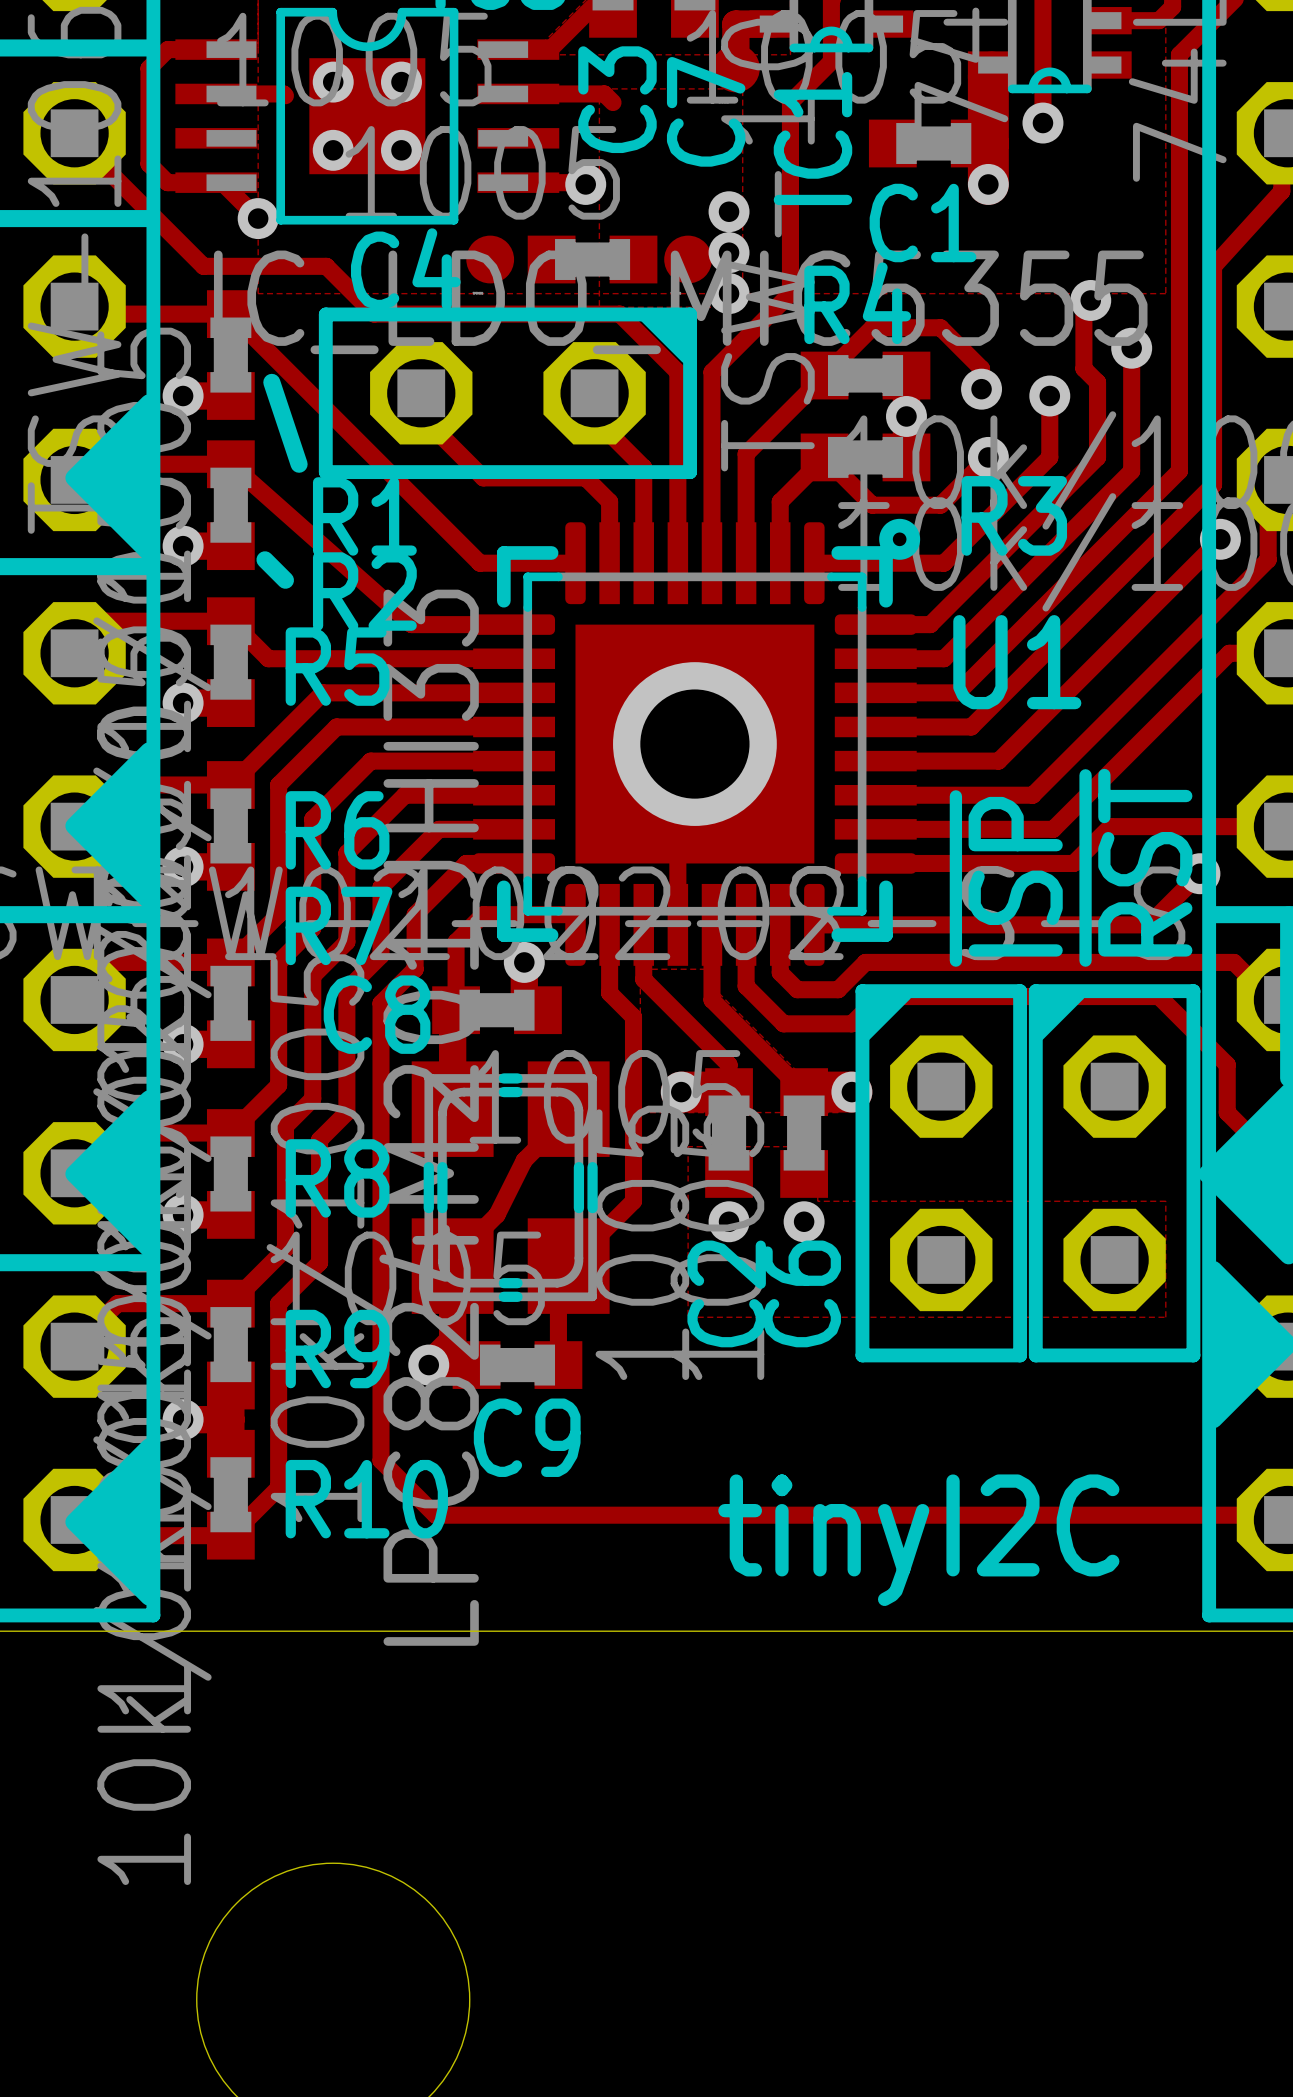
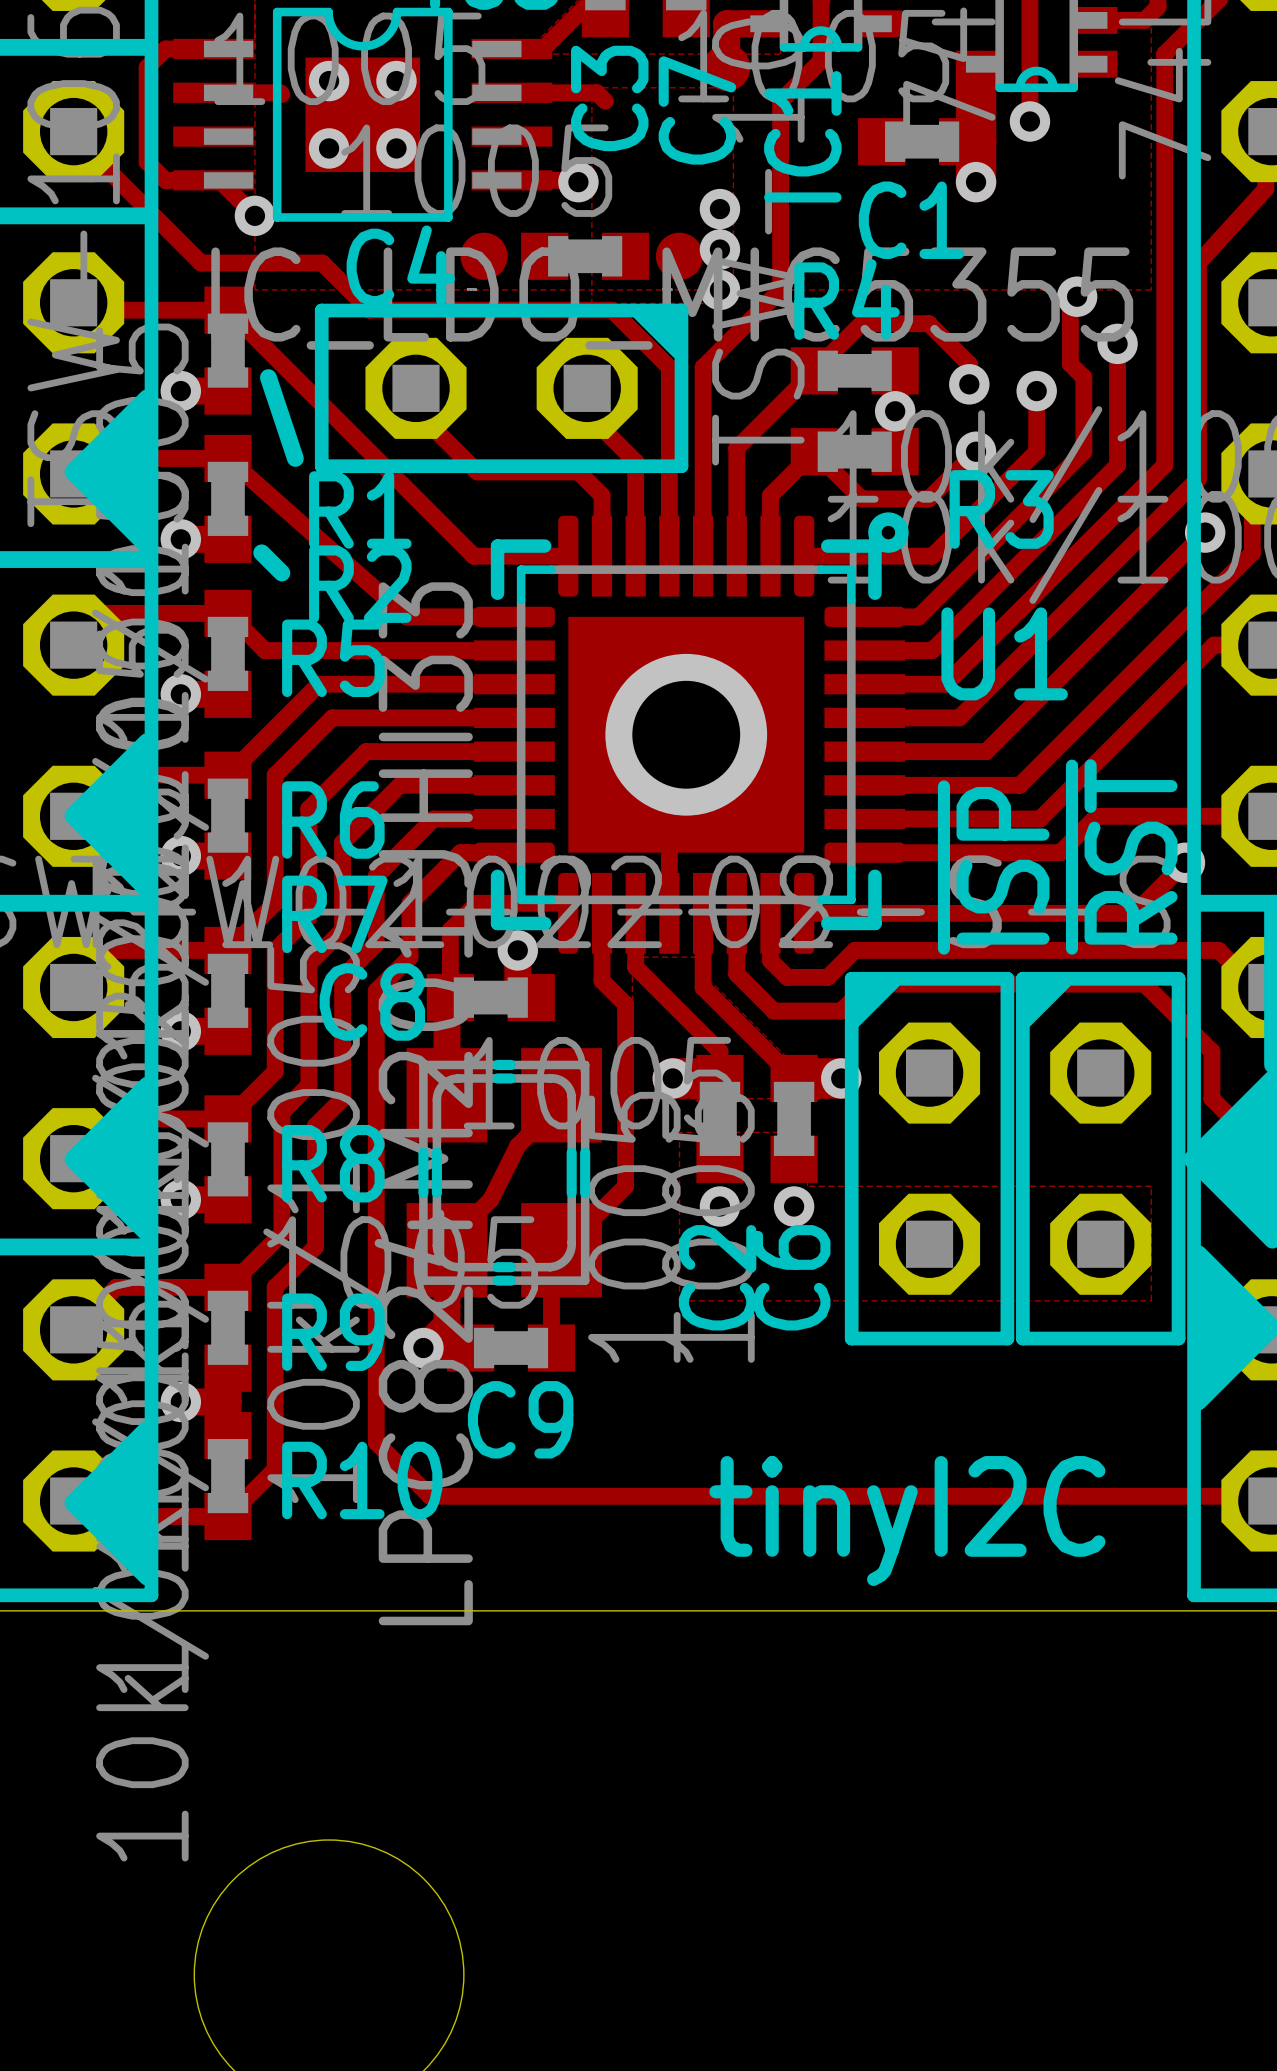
U1 footprint: [473, 518, 921, 966] -> [473, 512, 909, 954]

